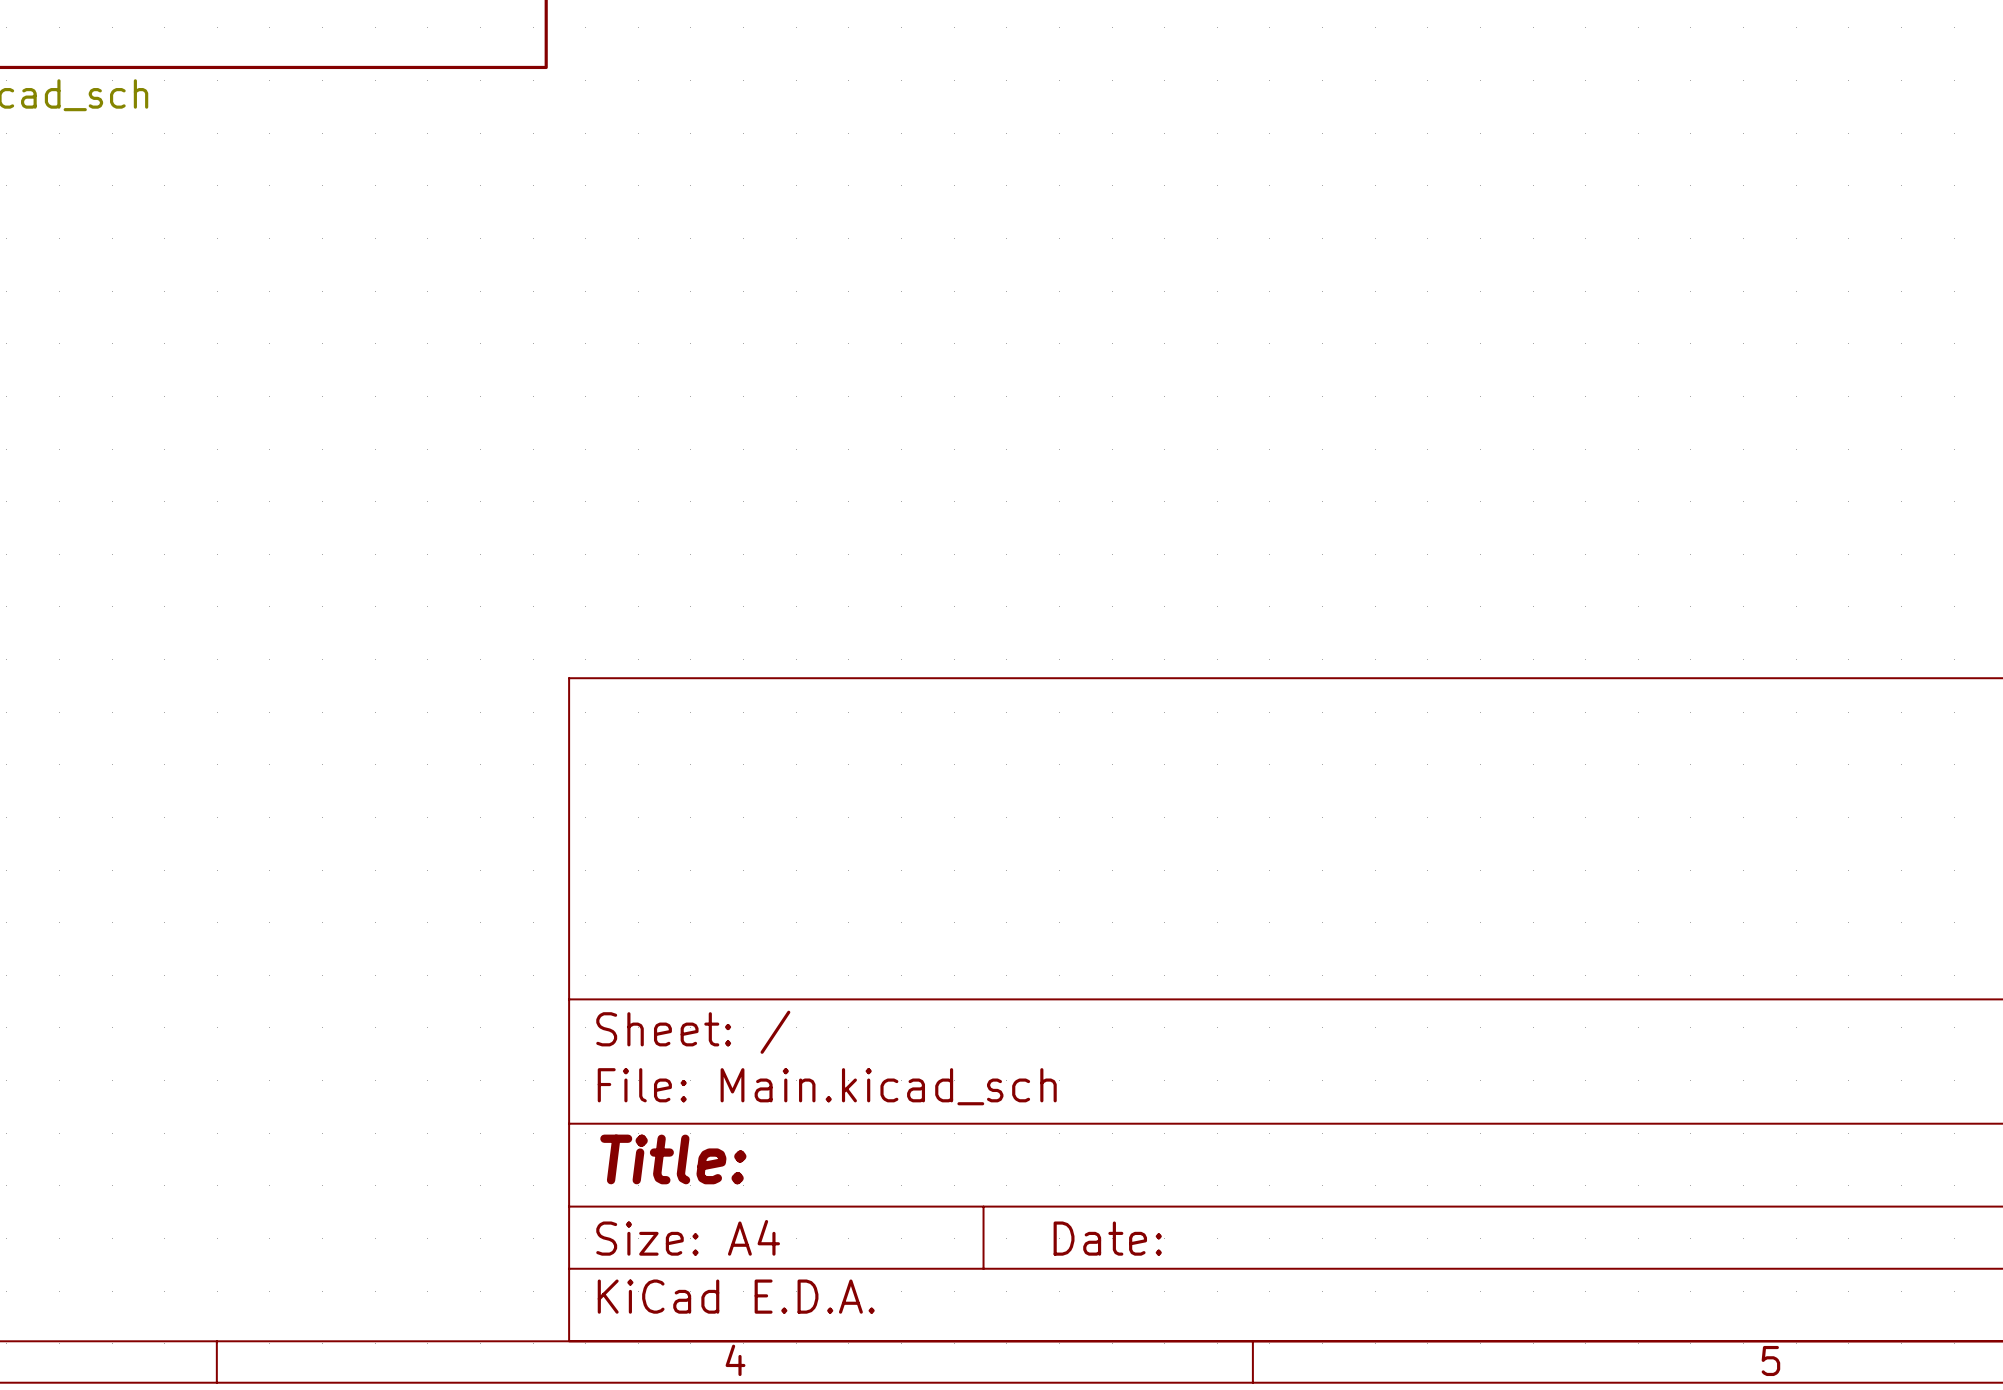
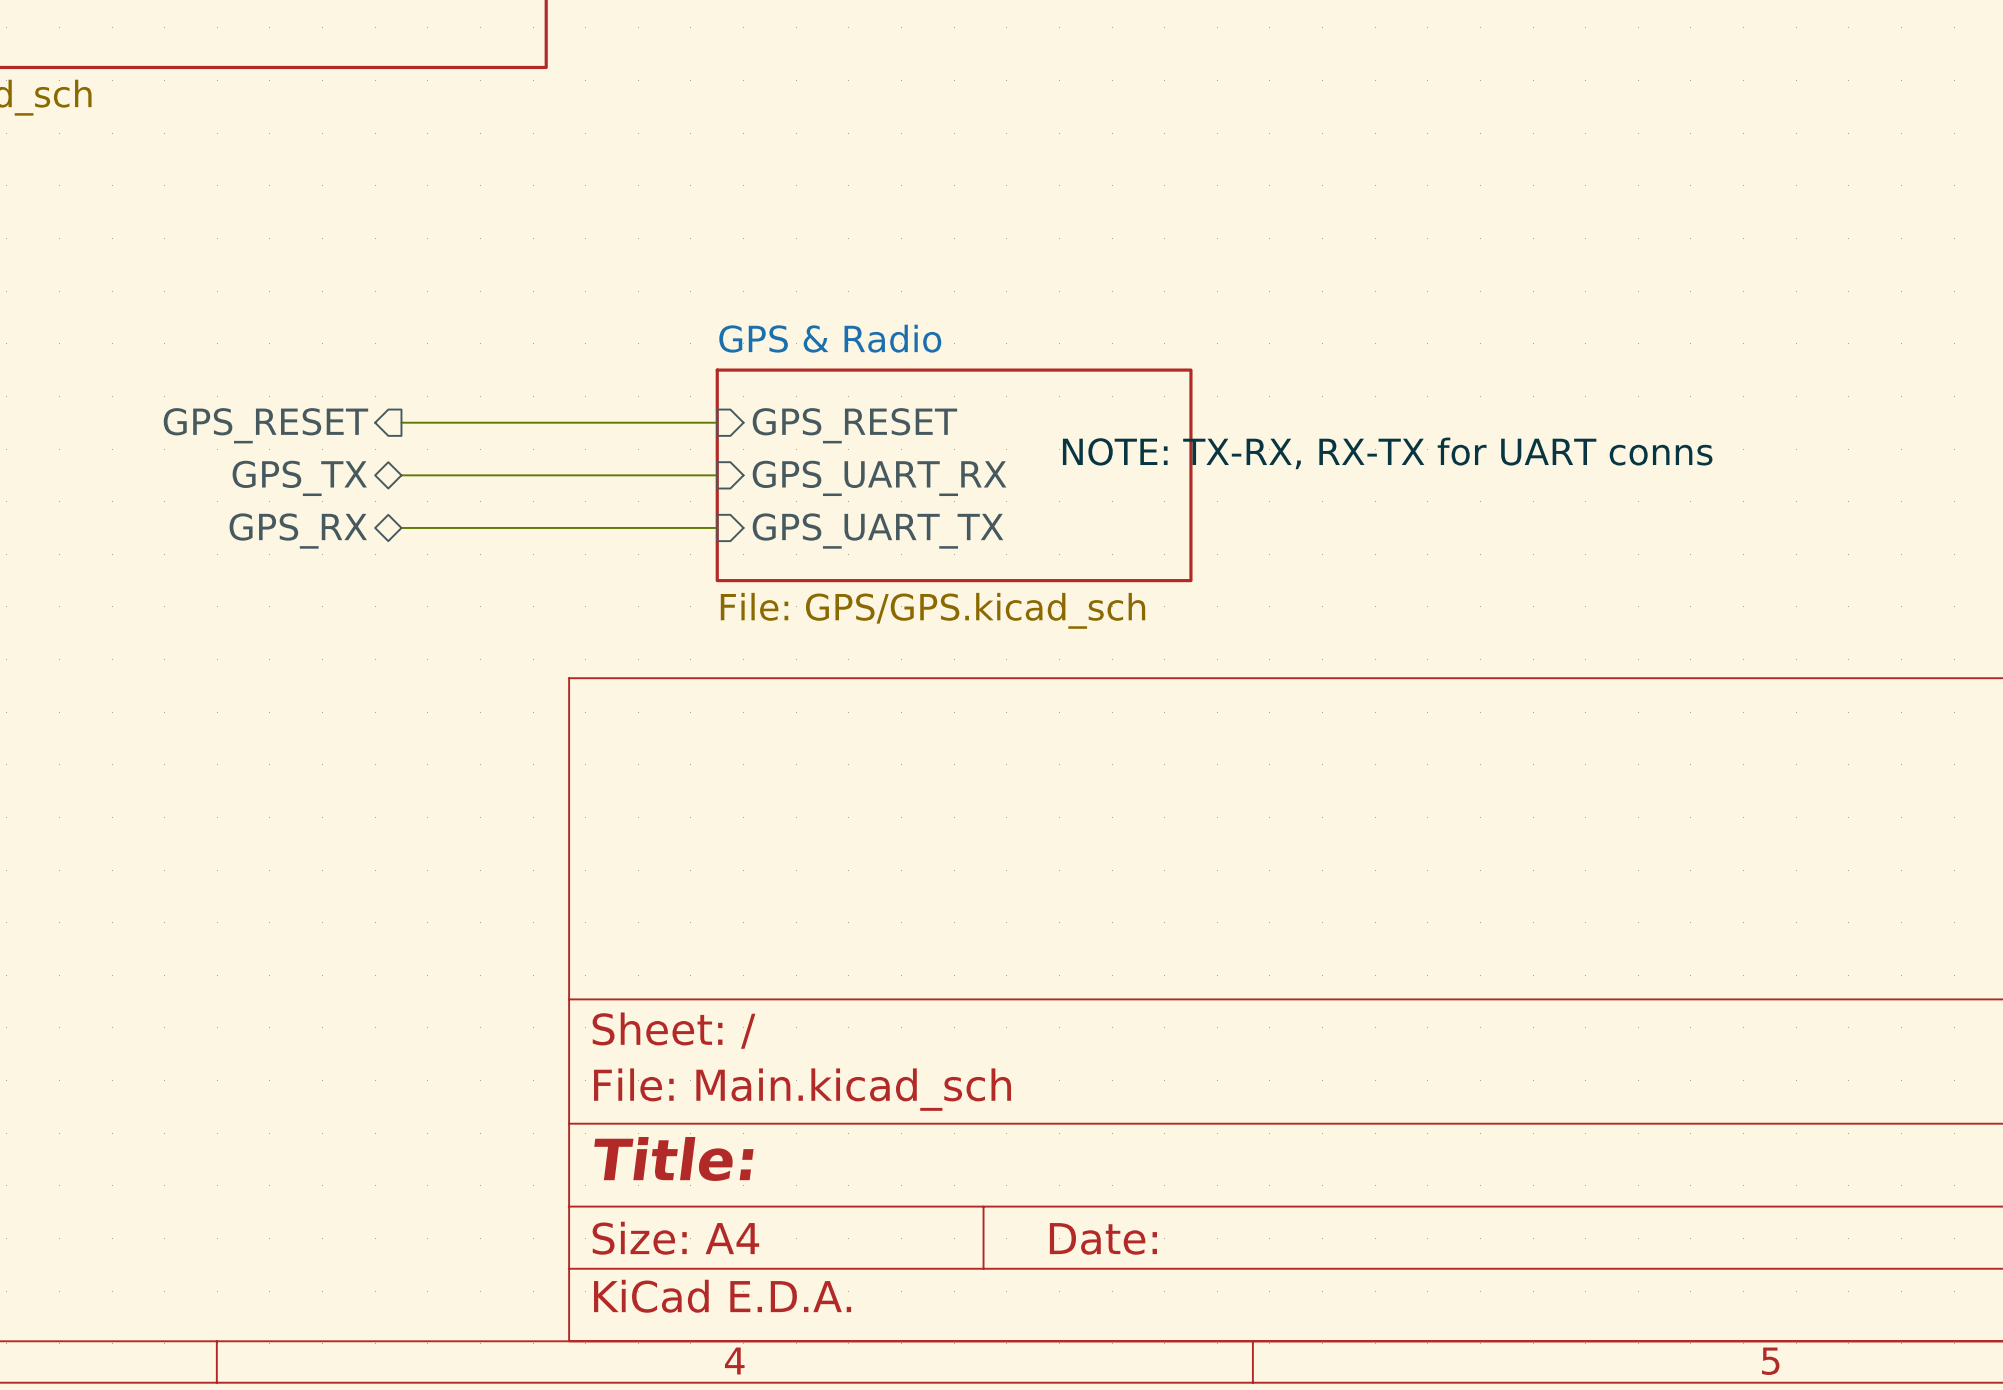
sheet pin: none -> GPS_RESET (265, 425)
wire: none -> (401, 422) (717, 422)
sheet pin: none -> GPS_RESET (854, 425)
label: none -> NOTE: TX-RX, RX-TX for UART conns (1387, 453)
sheet pin: none -> GPS_TX (299, 478)
wire: none -> (401, 475) (717, 475)
sheet pin: none -> GPS_UART_RX (879, 478)
sheet GPS & Radio: none -> File: GPS/GPS.kicad_sch (954, 475)
wire: none -> (401, 527) (717, 527)
sheet pin: none -> GPS_RX (298, 531)
sheet pin: none -> GPS_UART_TX (878, 531)

